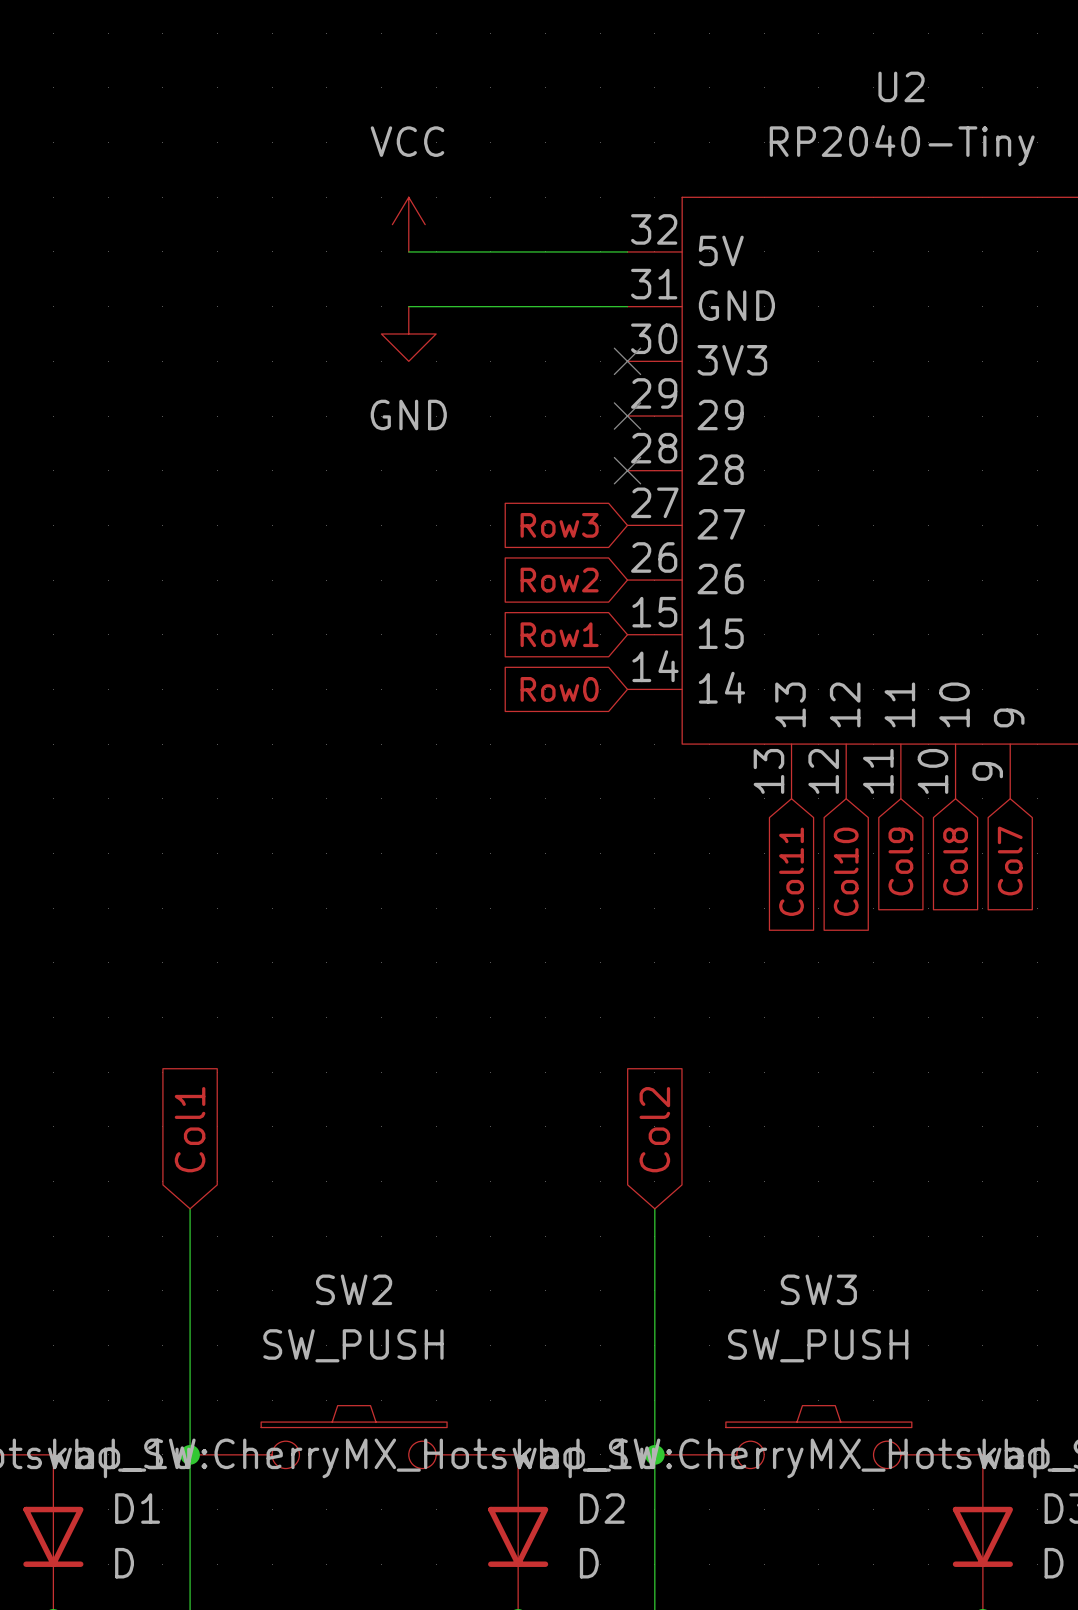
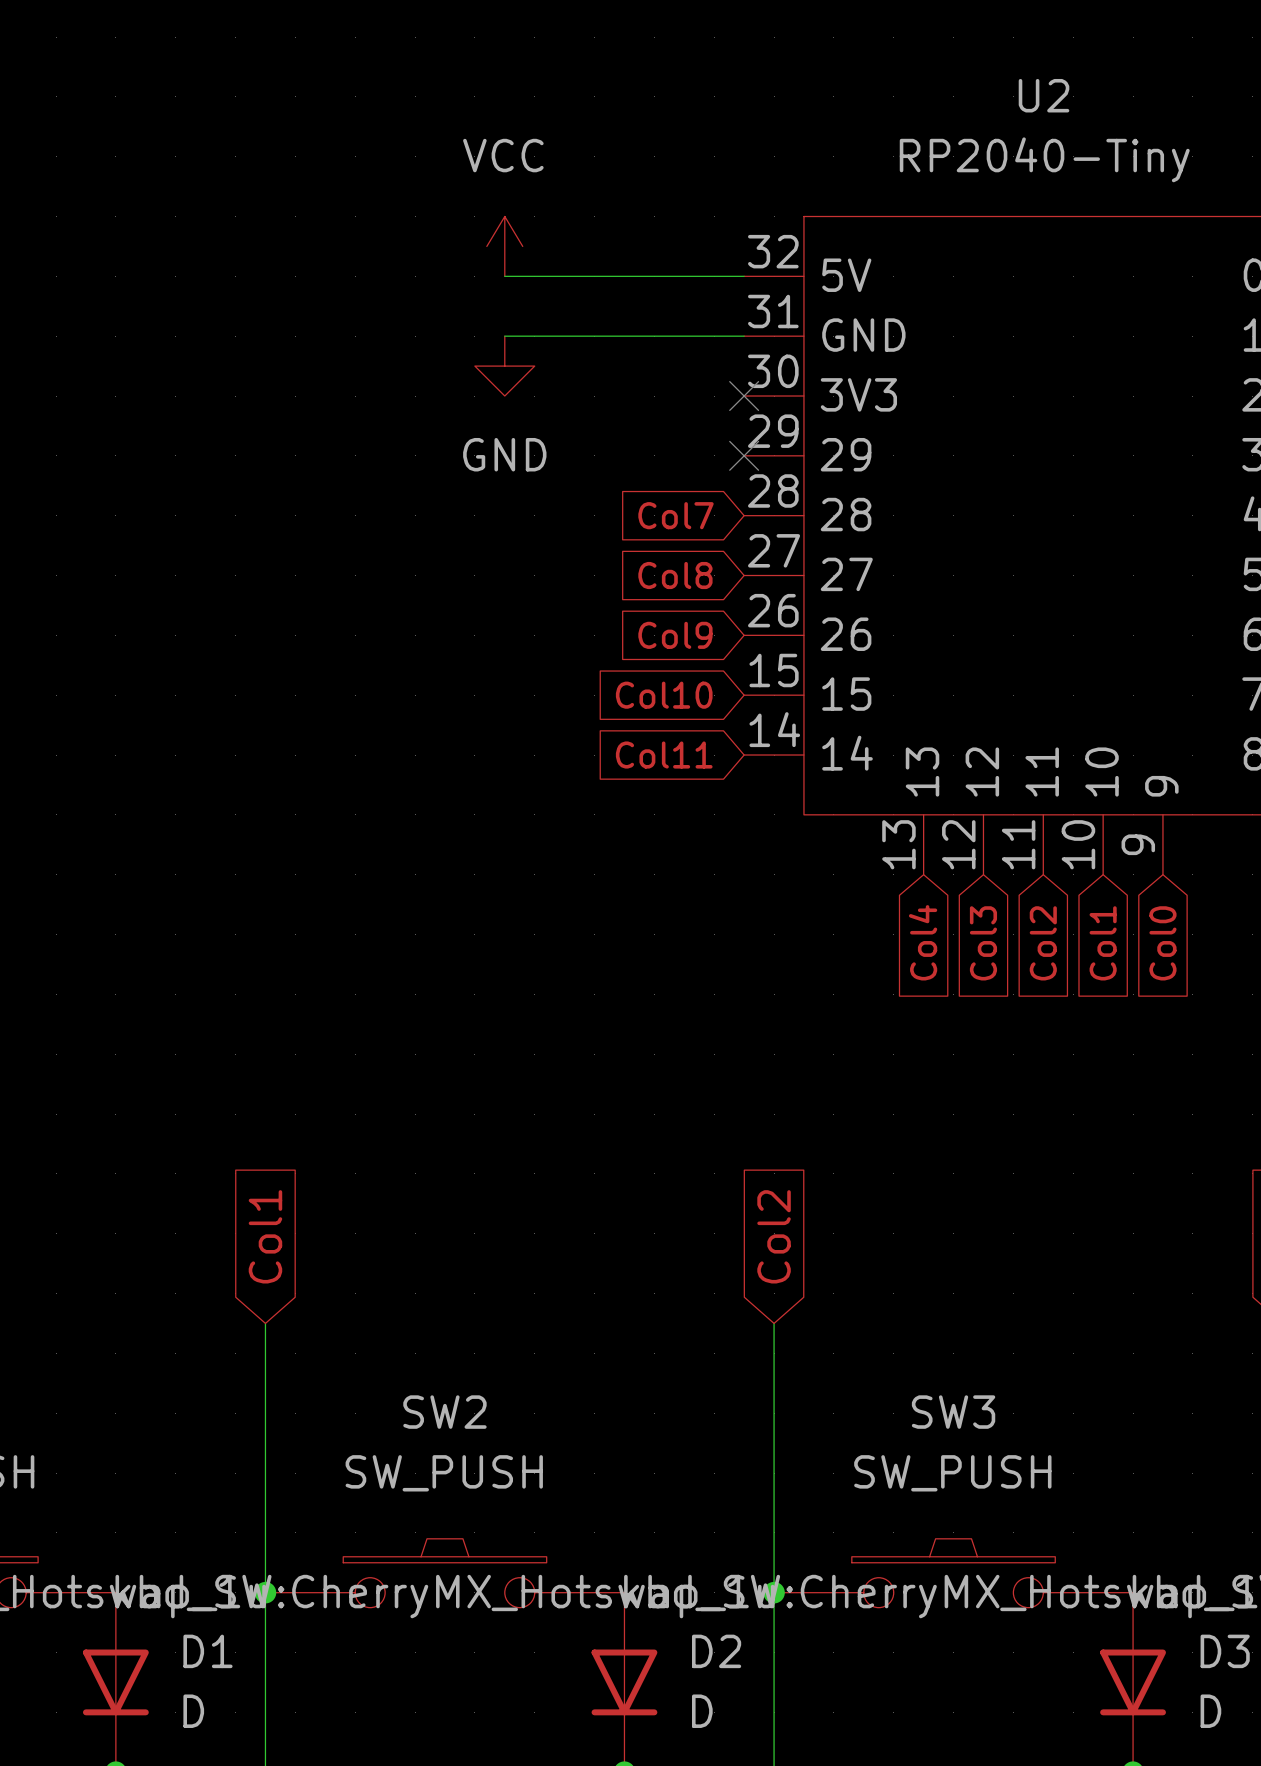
global label: none -> Col7 (676, 515)
no-connect mark: (627, 470) -> none
global label: Row3 (559, 525) -> Col8 (675, 575)
global label: Row2 (559, 580) -> Col9 (675, 635)
global label: Row1 (559, 634) -> Col10 (664, 695)
global label: Row0 (559, 689) -> Col11 (664, 755)
global label: Col9 (900, 861) -> Col2 (1043, 943)
global label: Col8 (955, 861) -> Col1 (1103, 943)
global label: Col7 (1010, 861) -> Col0 (1162, 943)
global label: Col11 (791, 871) -> Col4 (923, 942)
global label: Col10 (846, 871) -> Col3 (983, 943)

